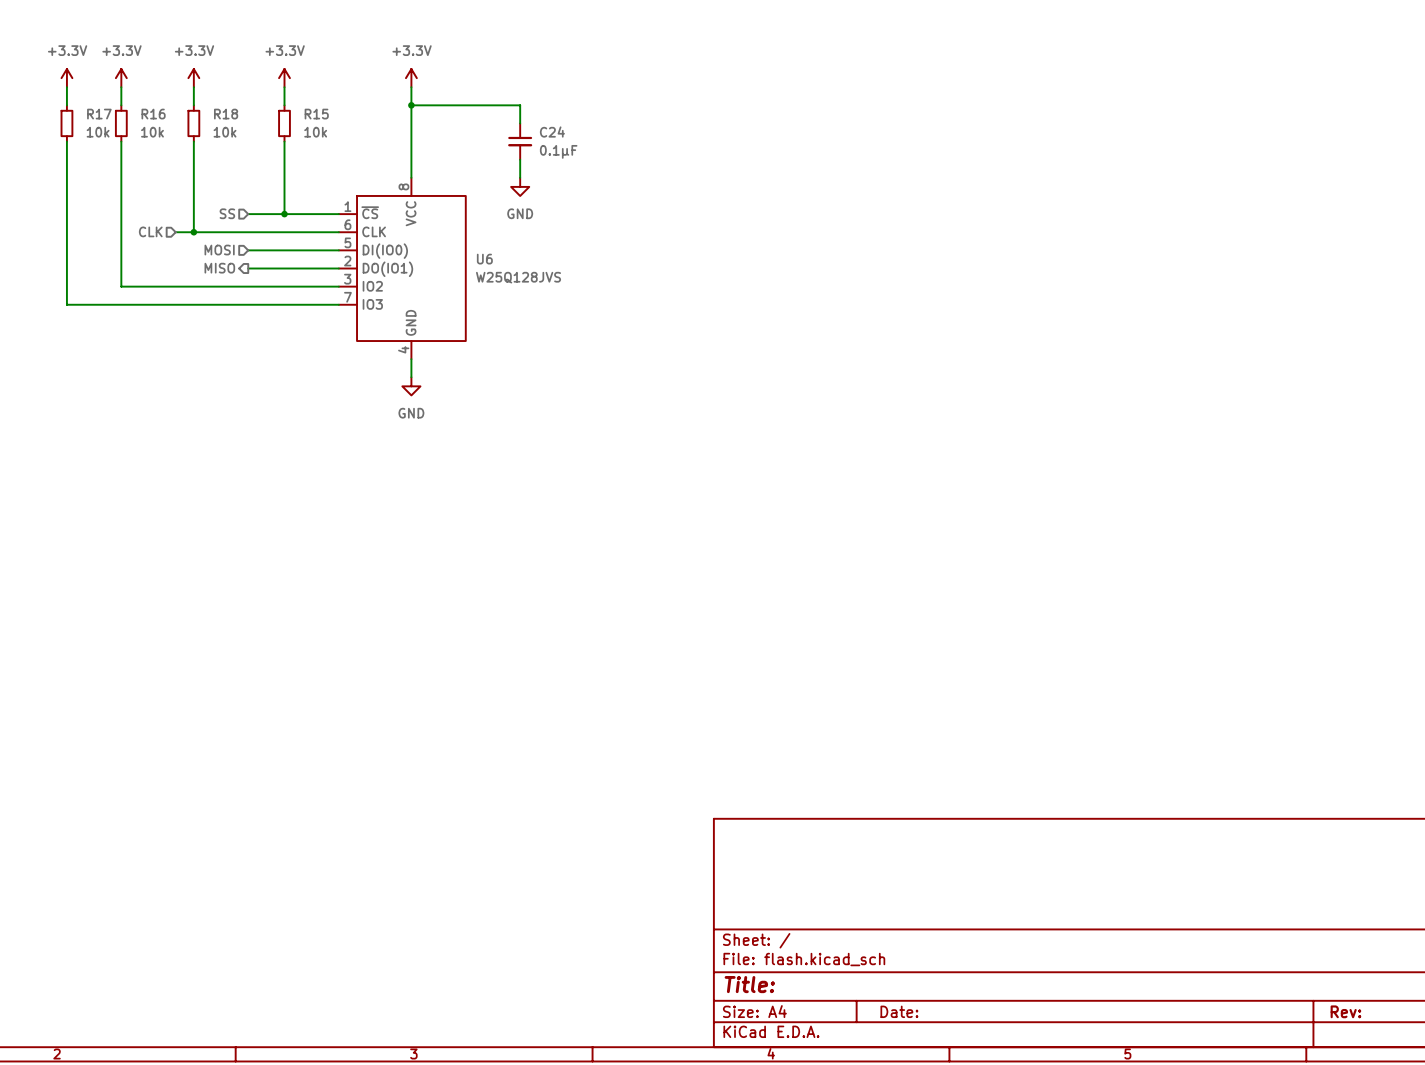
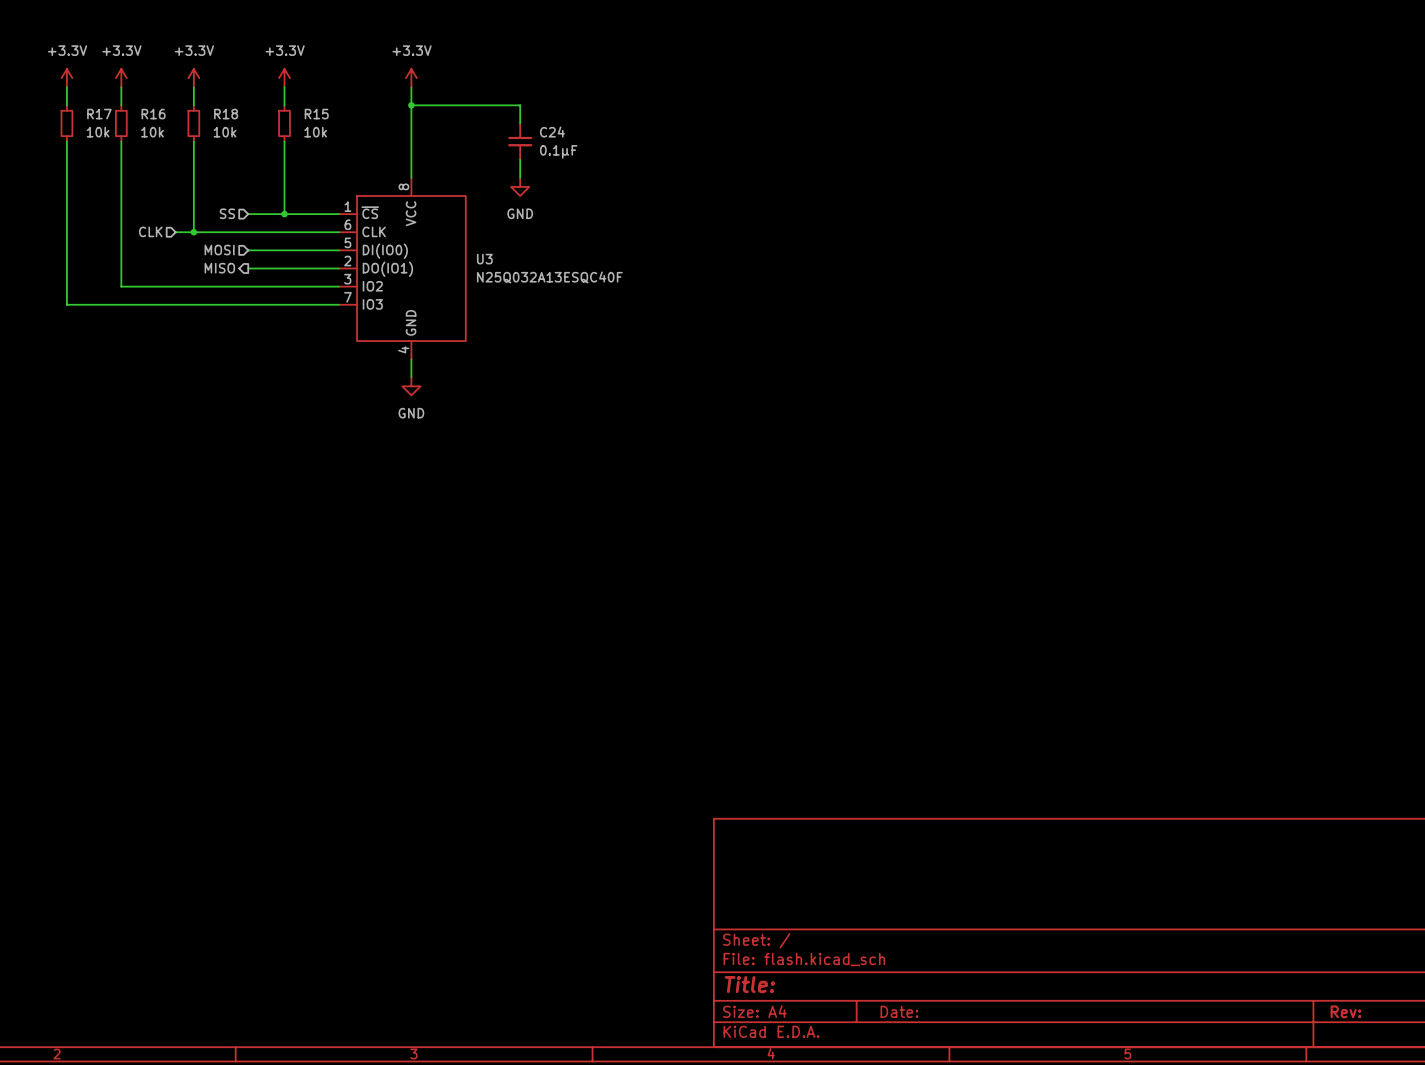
U6 name: U6 (484, 259) -> U3 (484, 259)
U6 value: W25Q128JVS (518, 277) -> N25Q032A13ESQC40F (549, 277)

